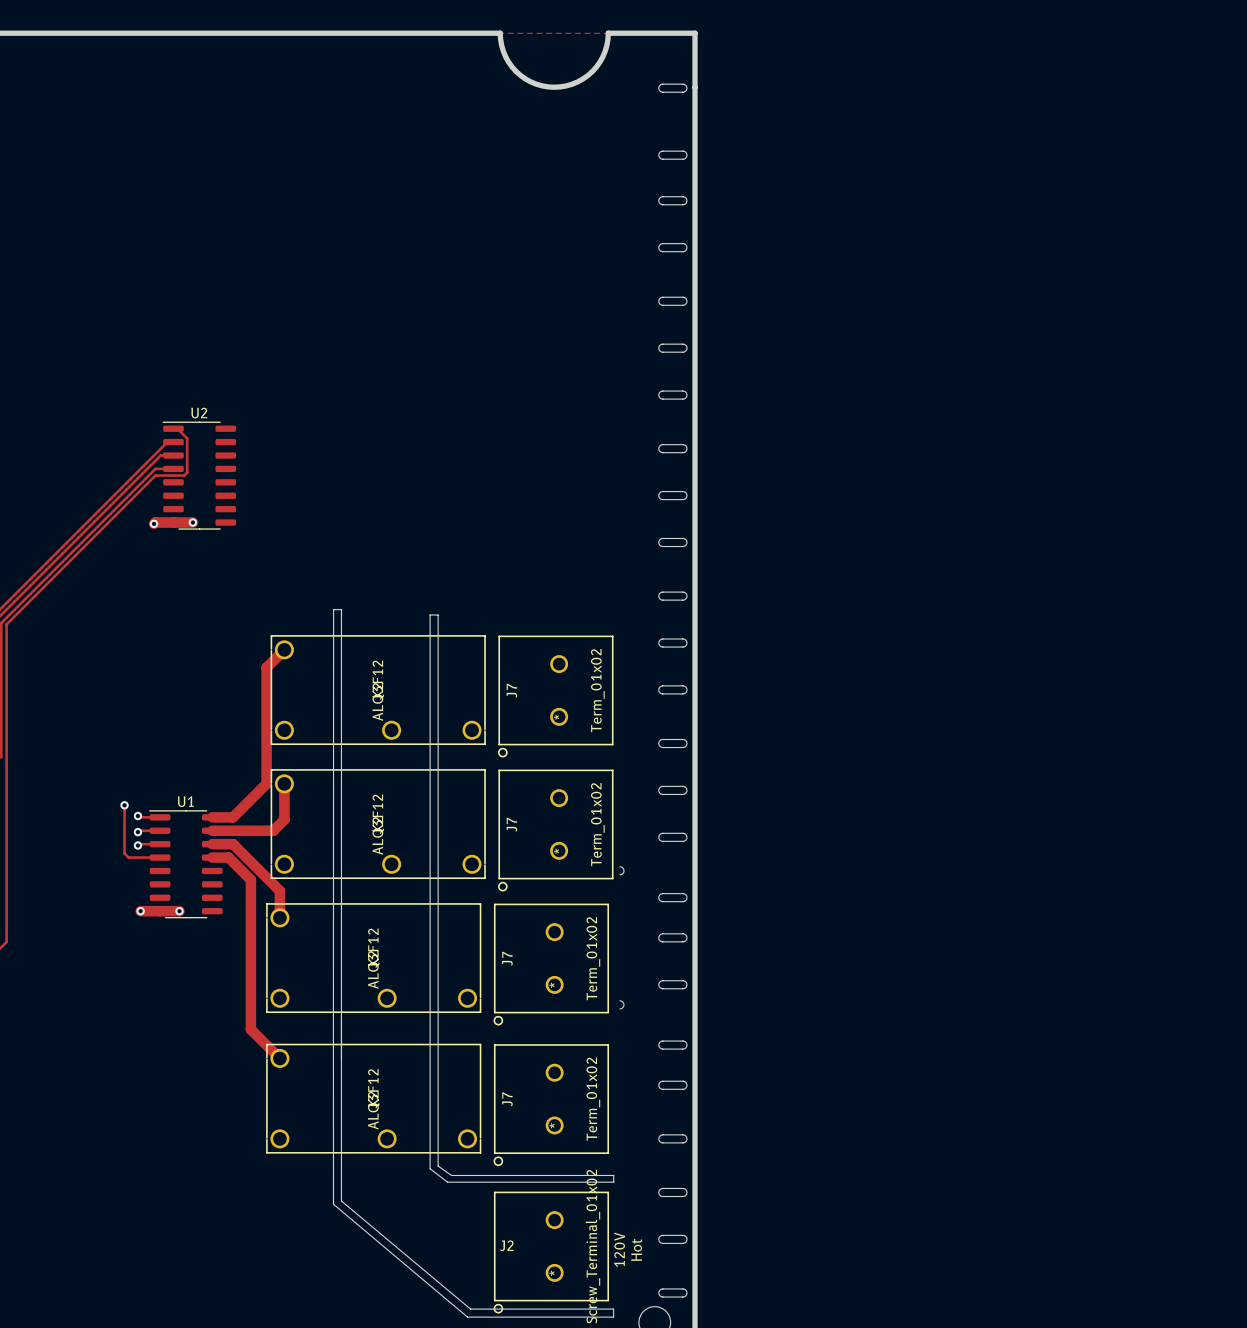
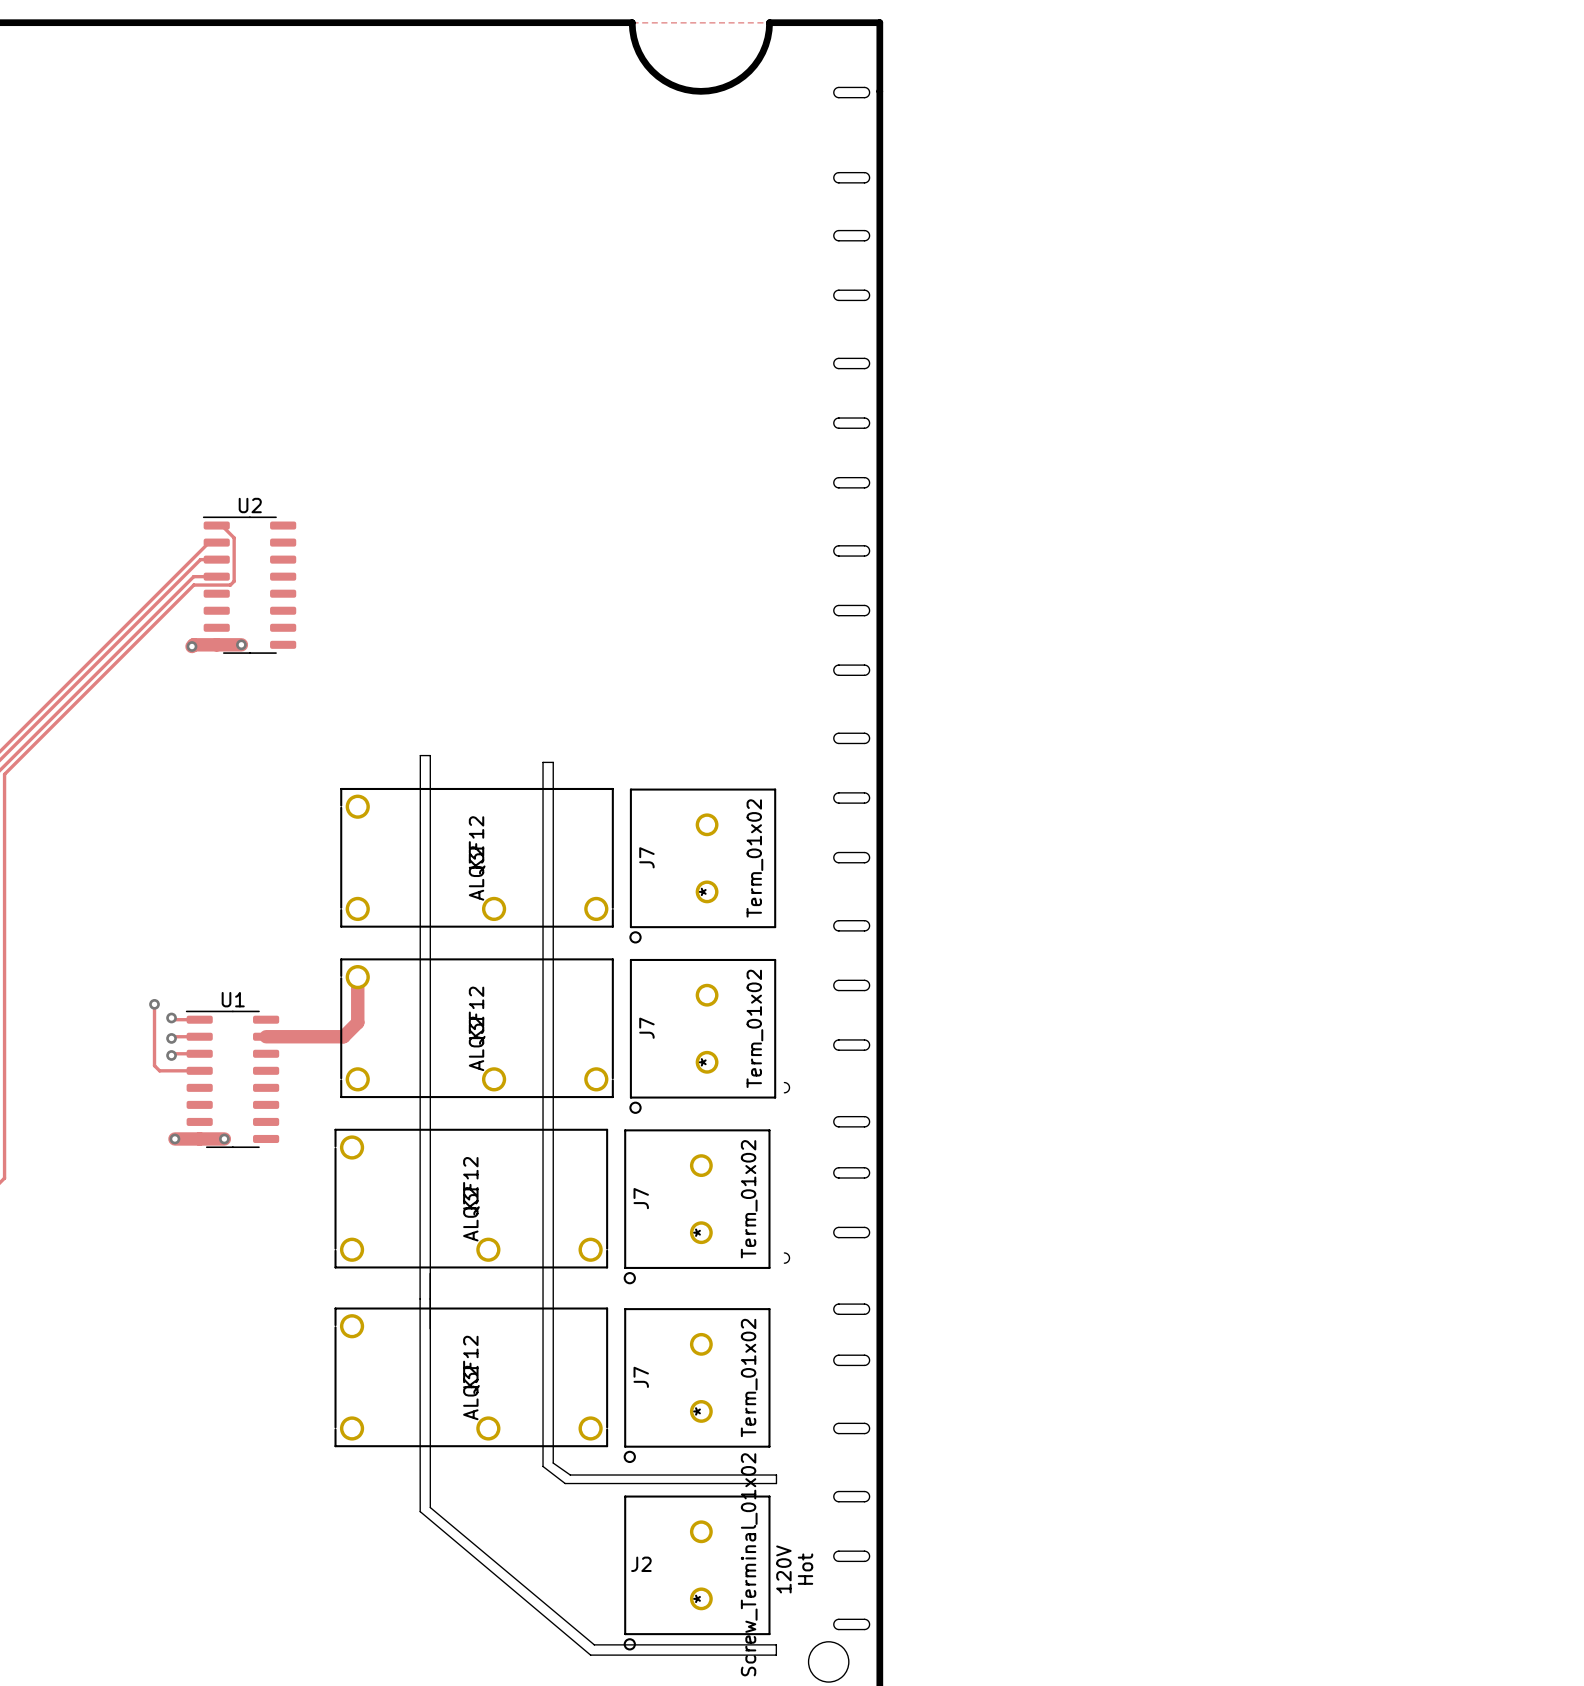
track: (284, 649) (266, 667) (266, 783) (232, 817) (212, 817) -> none
track: (212, 844) (233, 844) (279, 890) (279, 917) -> none
track: (212, 857) (228, 857) (250, 879) (250, 1029) (279, 1058) -> none

